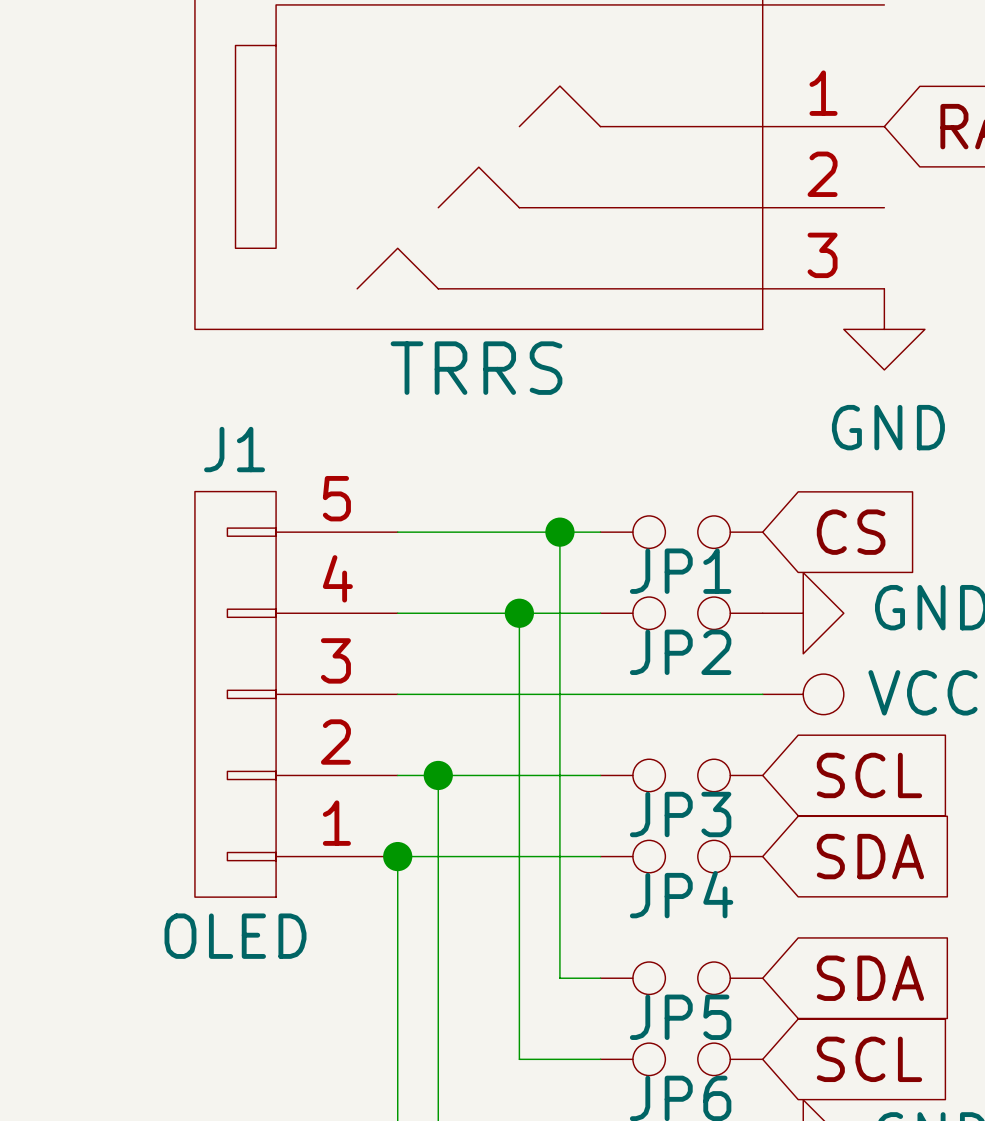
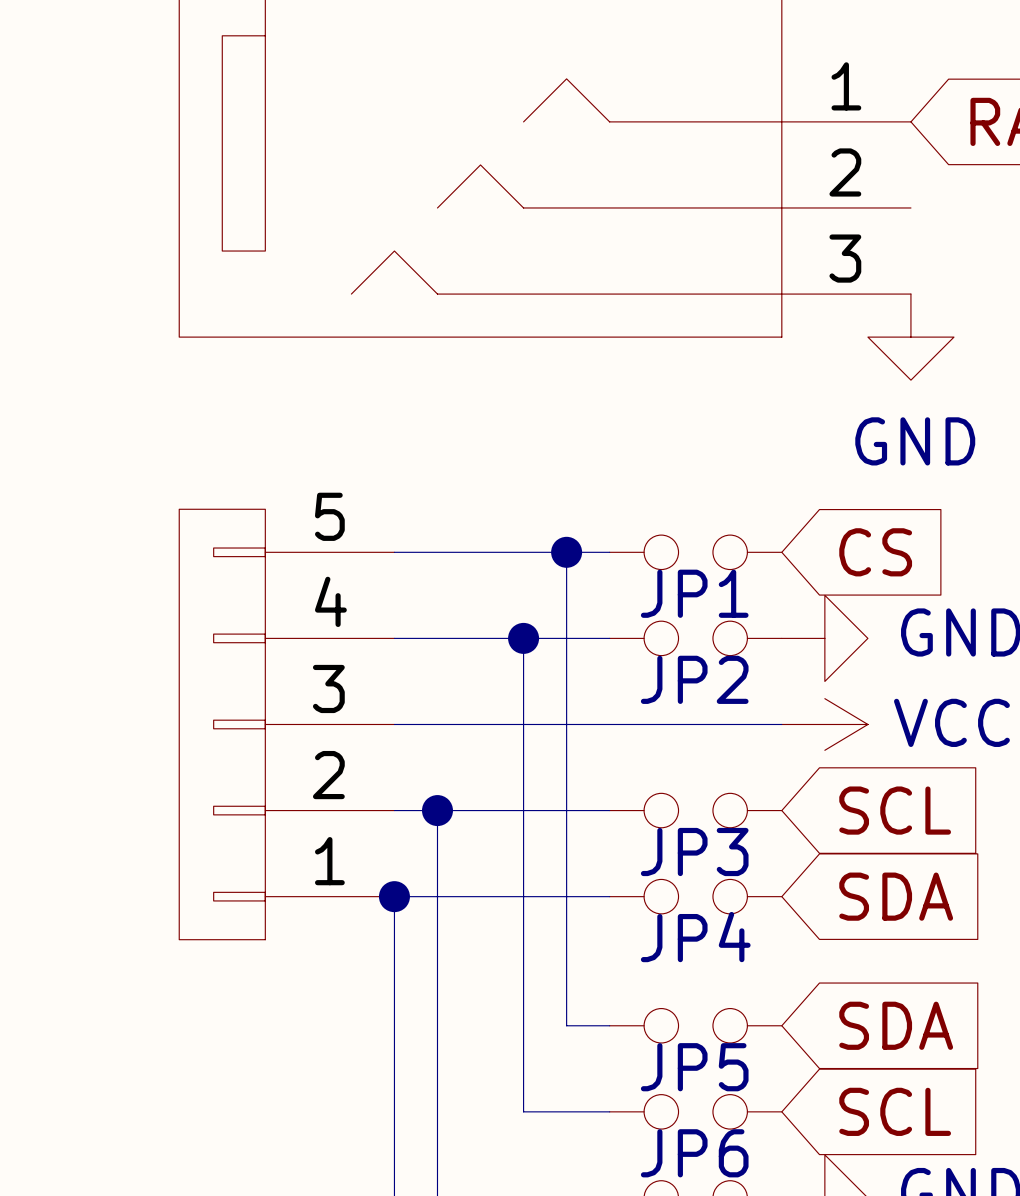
part value: TRRS (476, 368) -> none
J1 name: J1 (234, 449) -> none
power symbol shape: [762, 674, 844, 715] -> [781, 698, 868, 751]
J1 value: OLED (235, 936) -> none

